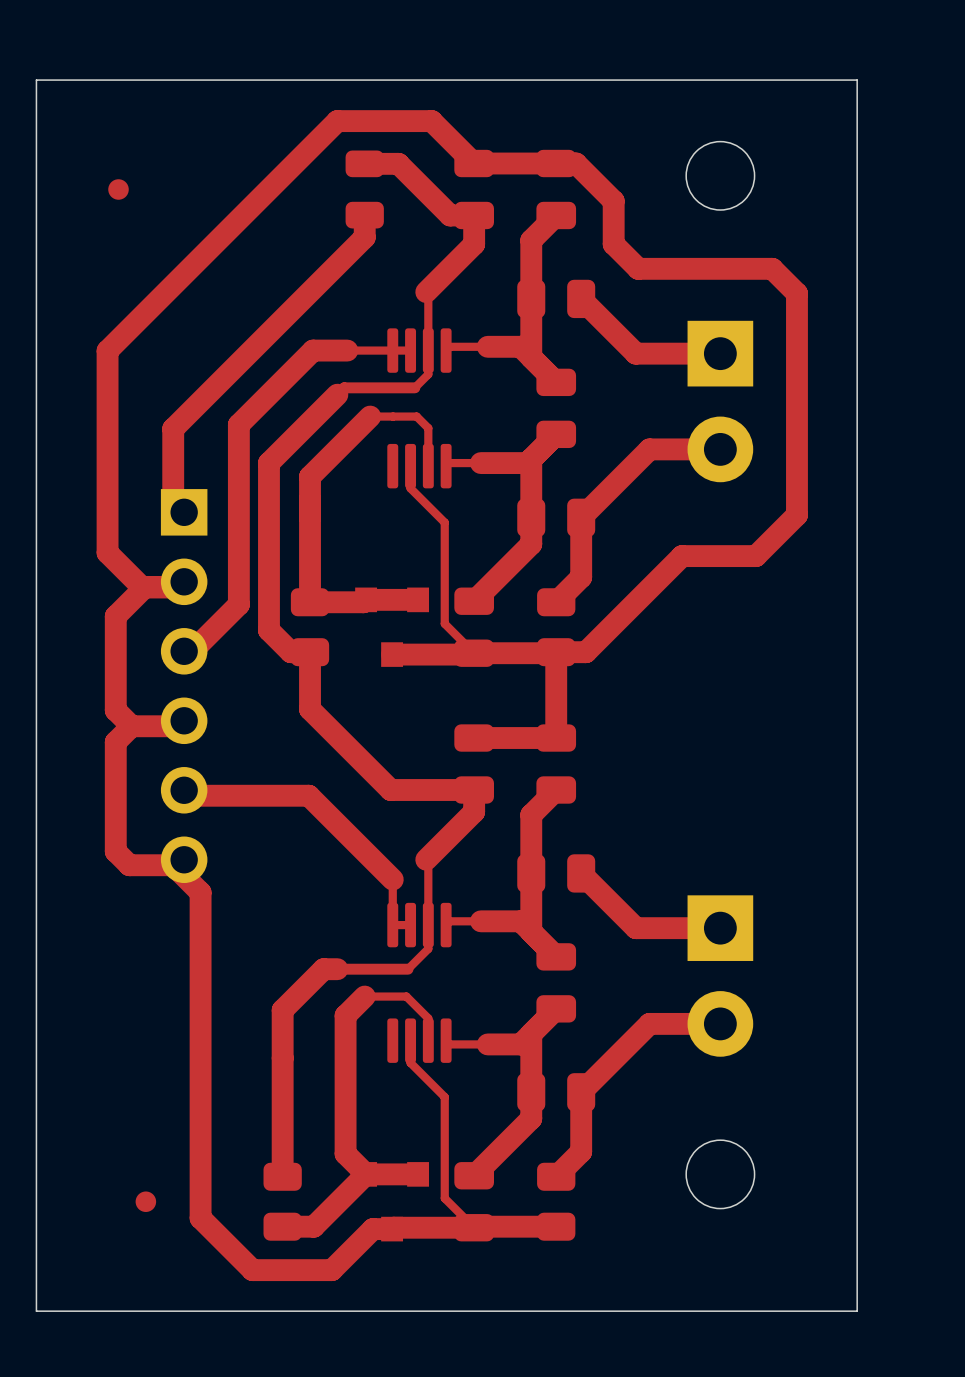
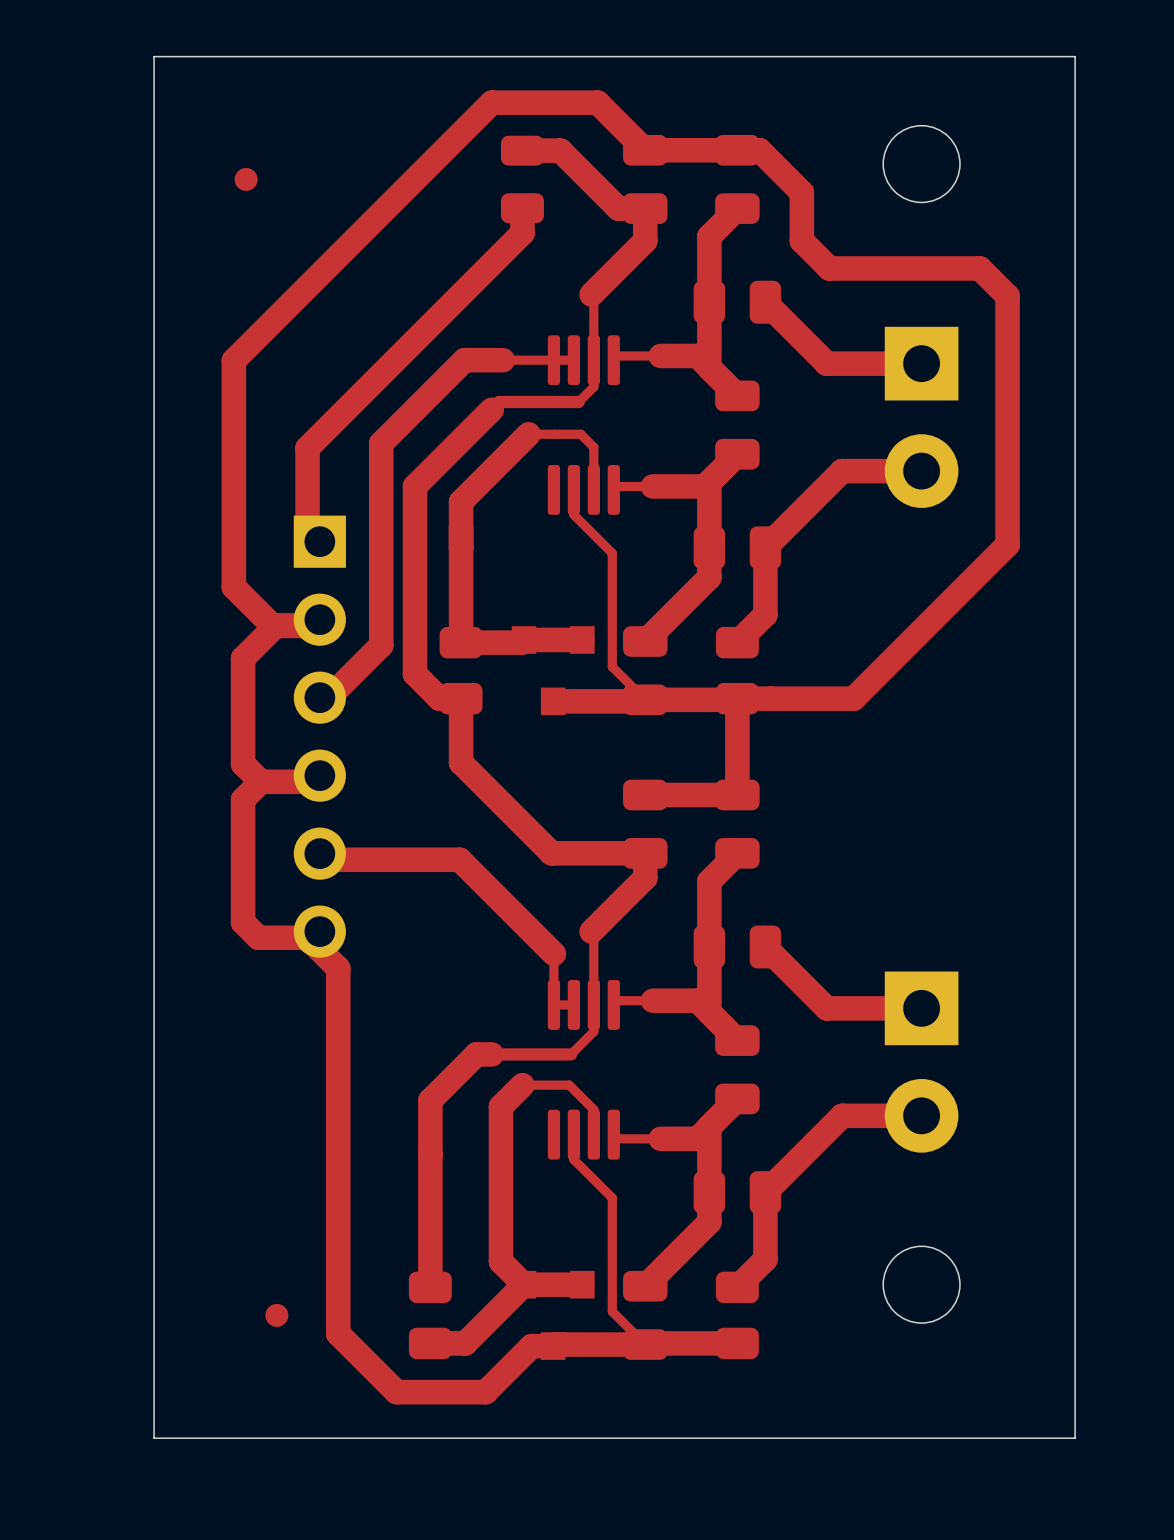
top track: (755, 556) (682, 556) (585, 652) -> (961, 590) (853, 698) (770, 698)

